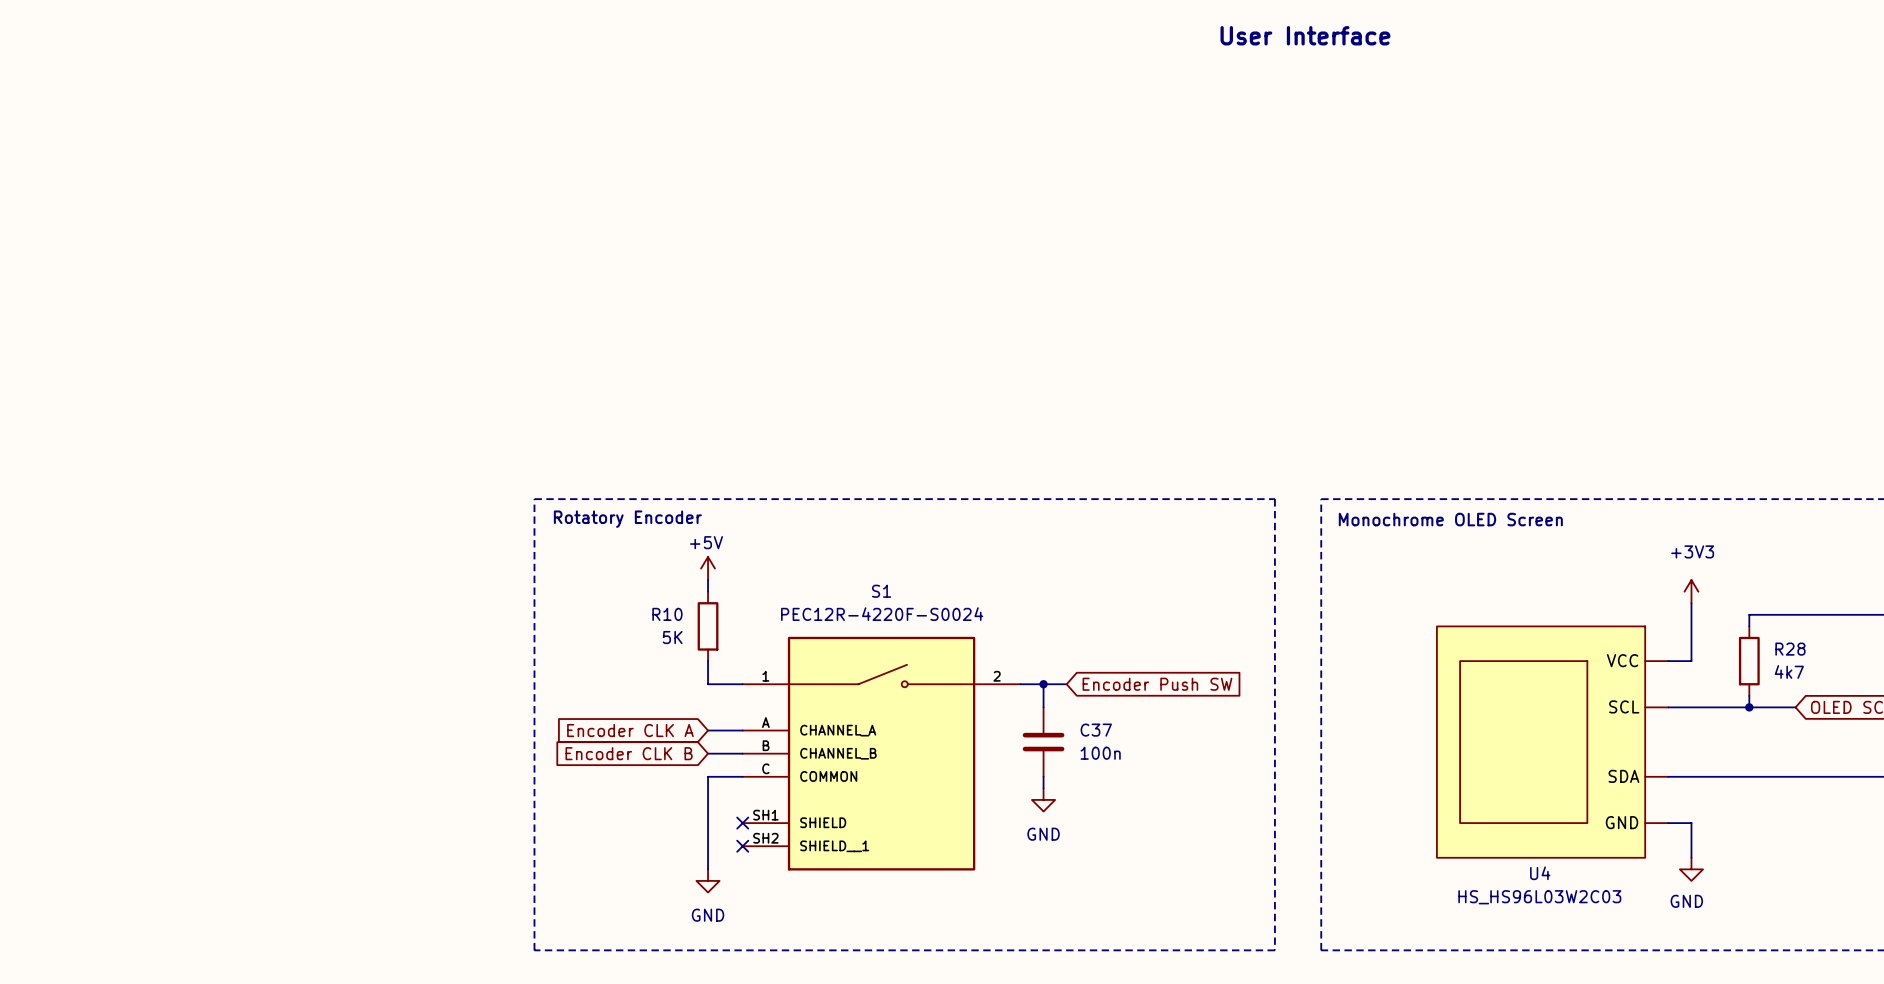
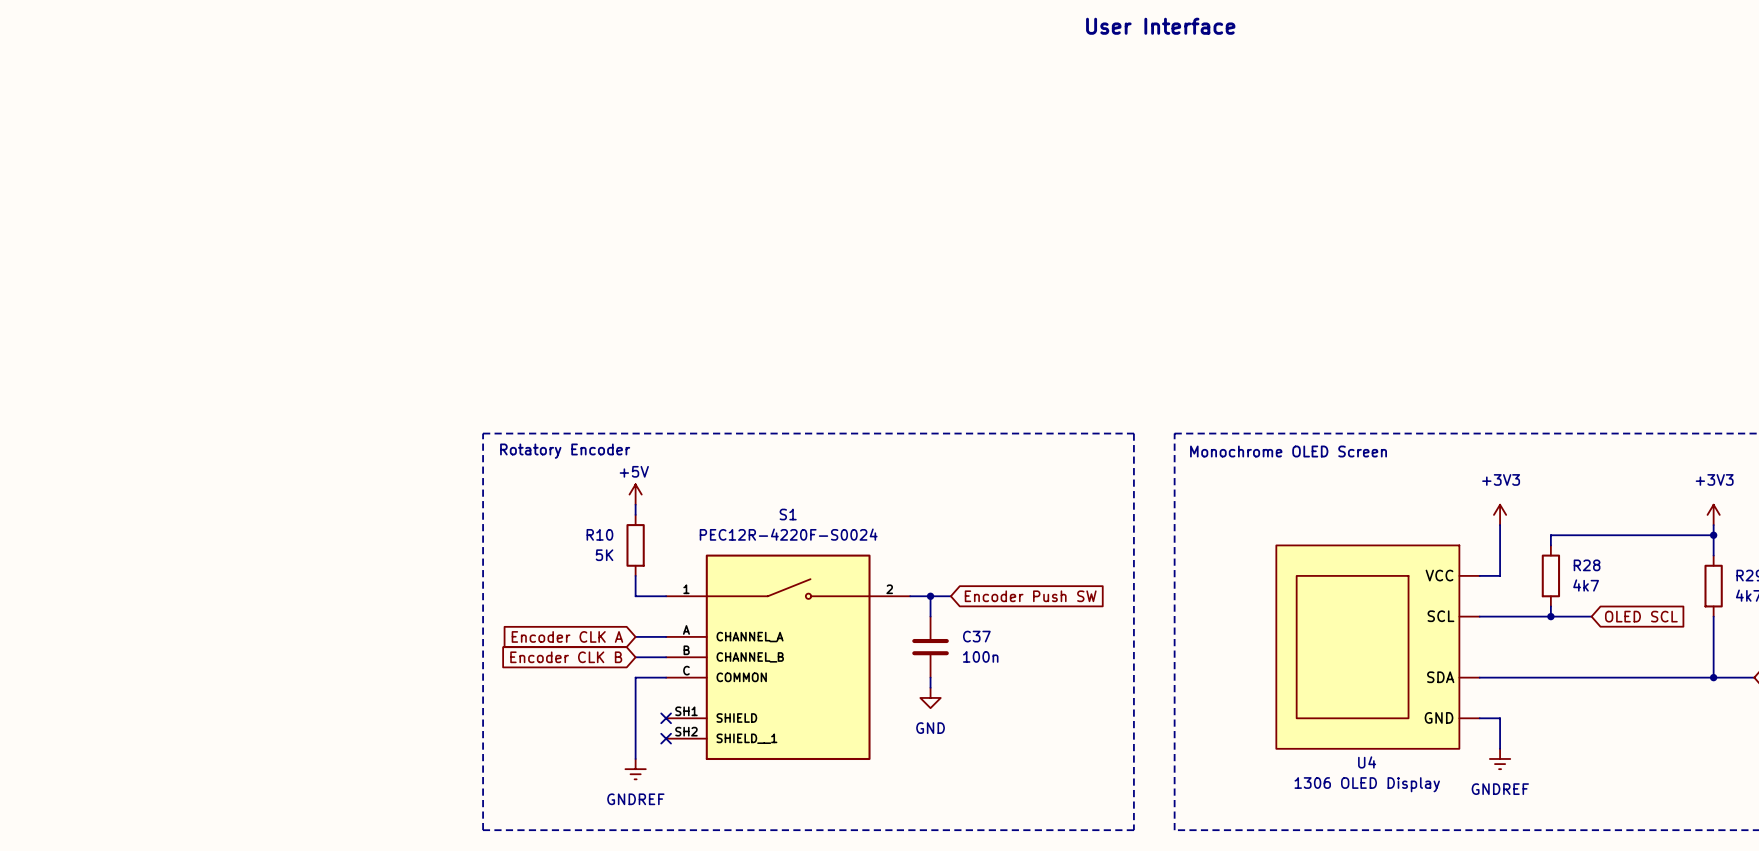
power symbol: GND (1691, 869) -> GNDREF (1500, 758)
power symbol: GND (708, 880) -> GNDREF (635, 769)
U4 value: HS_HS96L03W2C03 (1539, 897) -> 1306 OLED Display (1367, 784)

